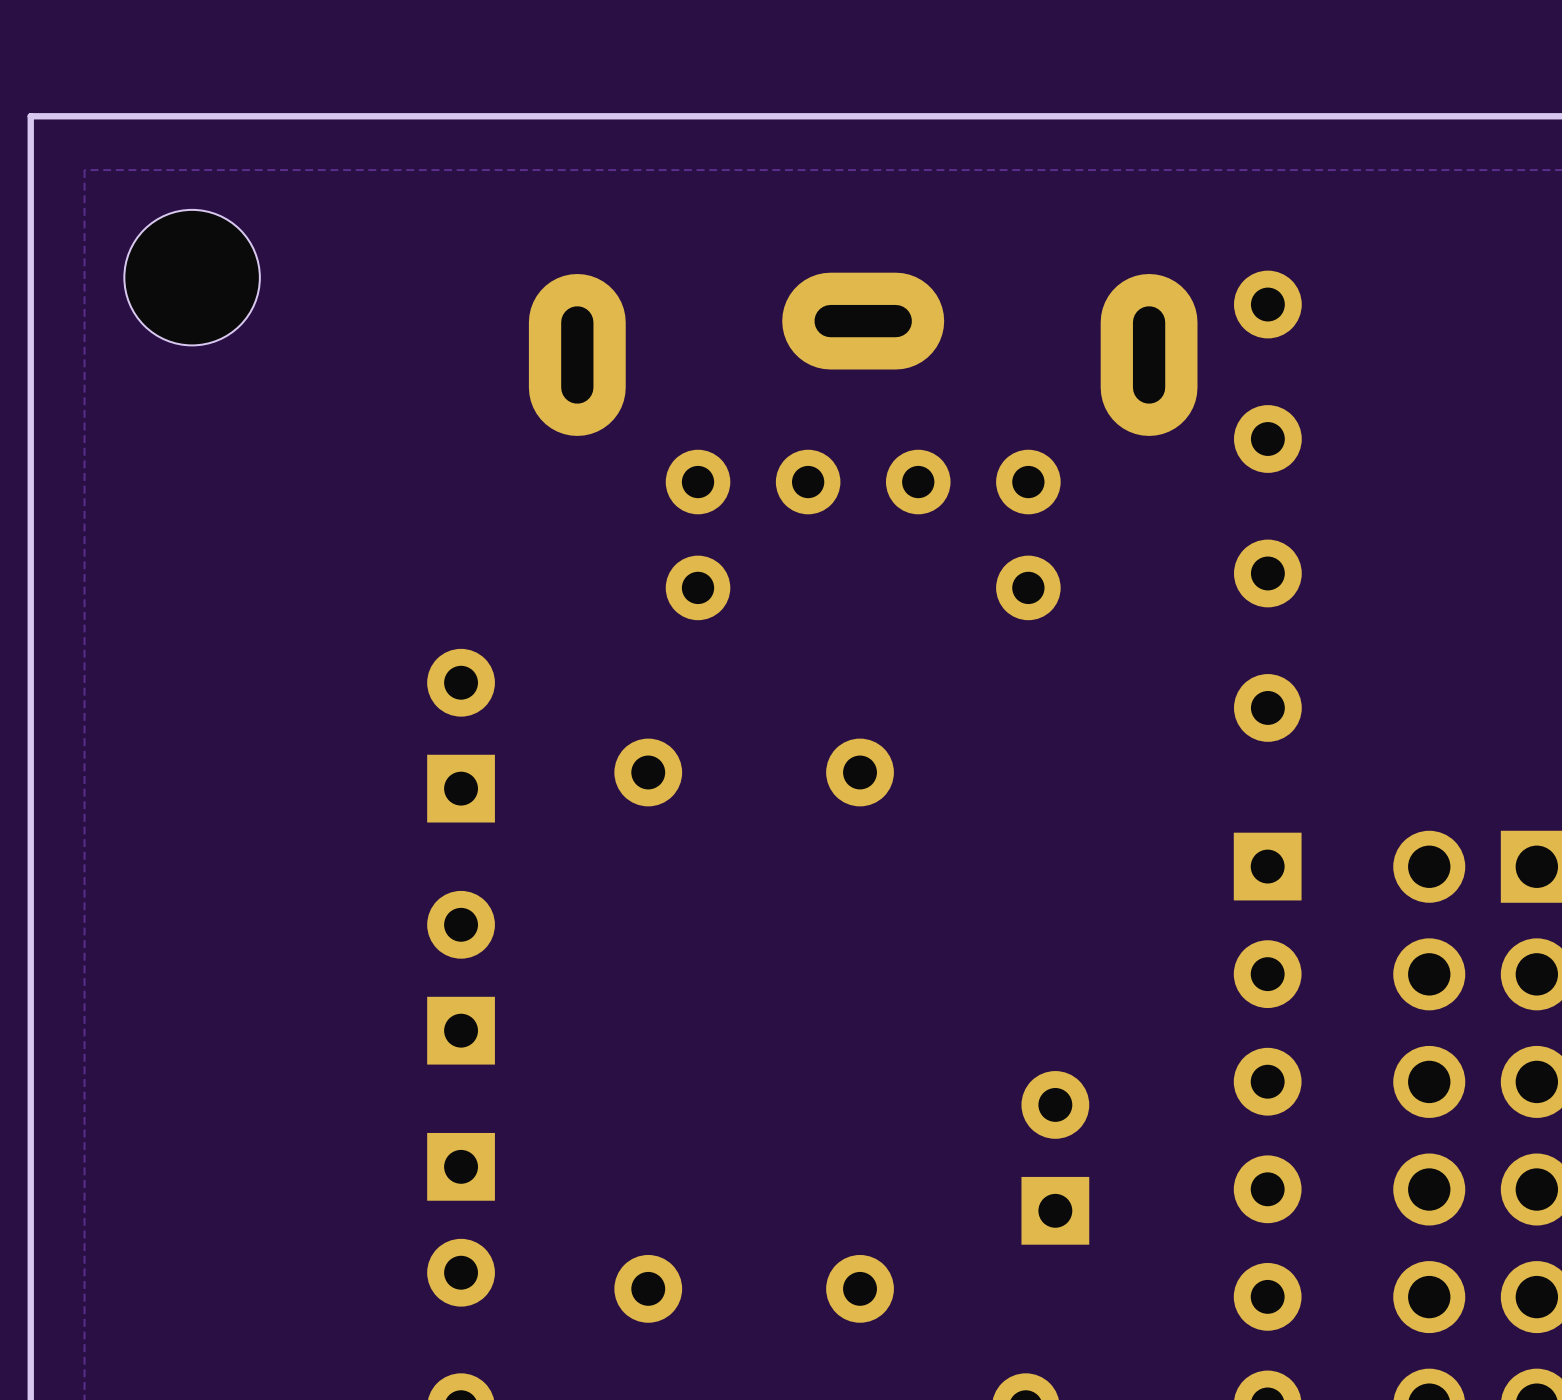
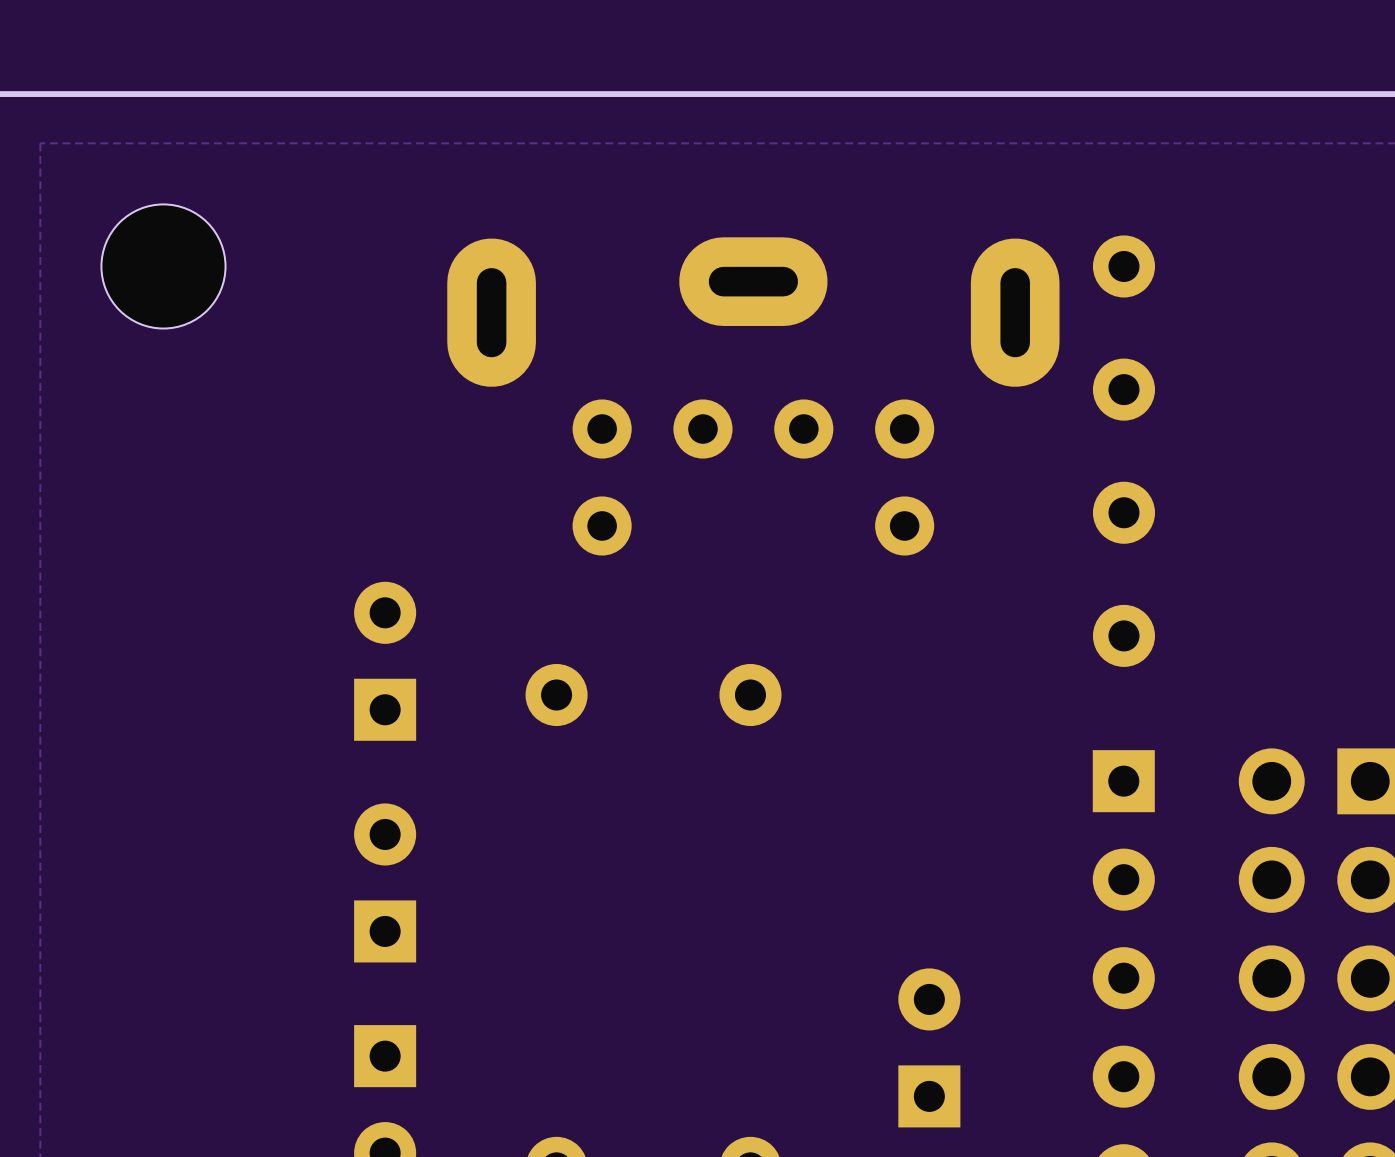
part position: (192, 277) -> (163, 266)

